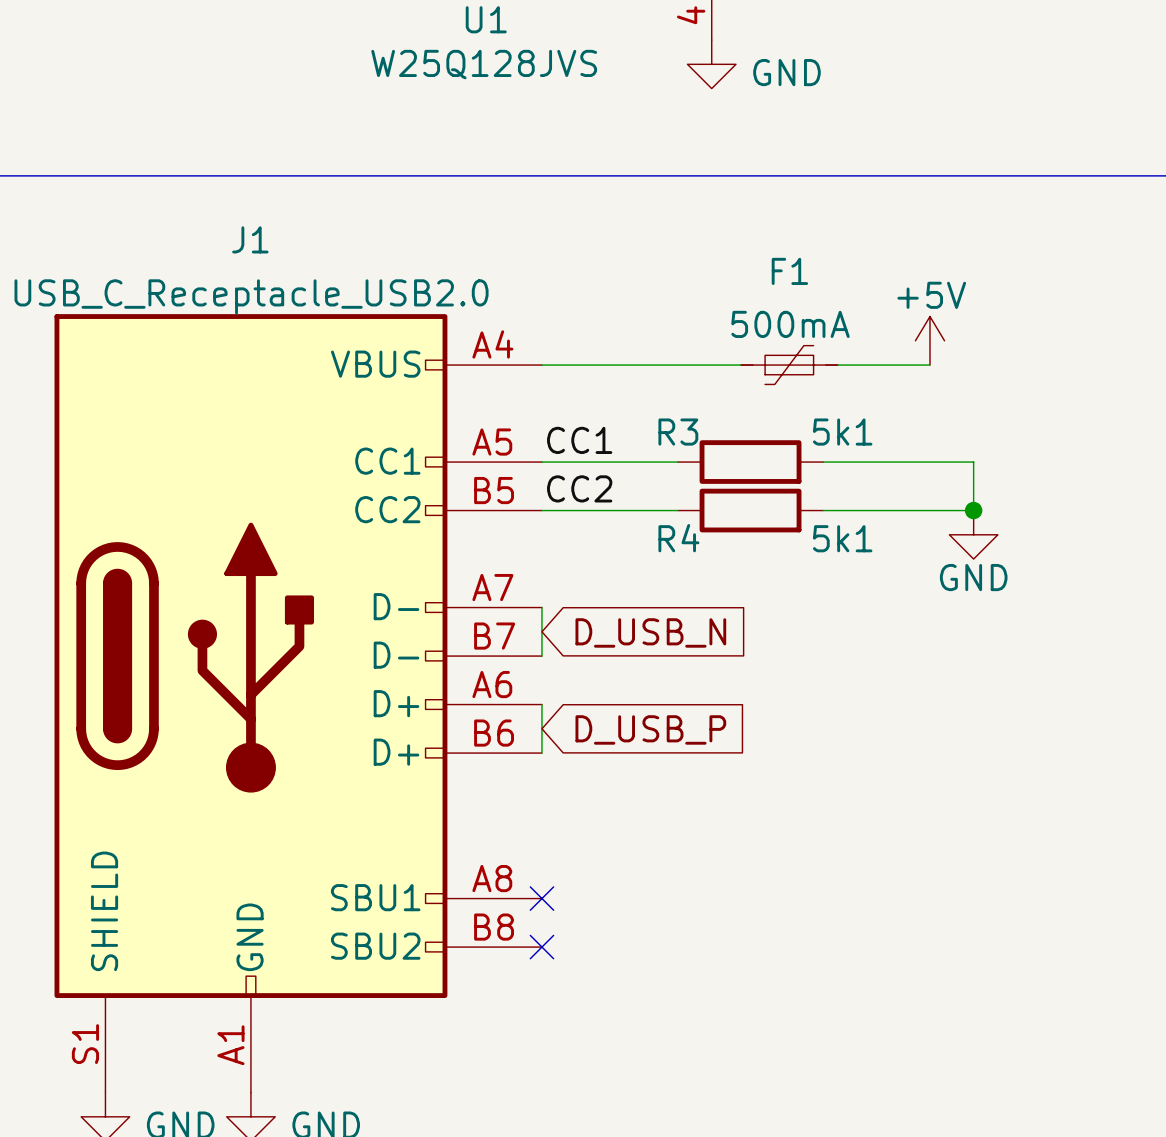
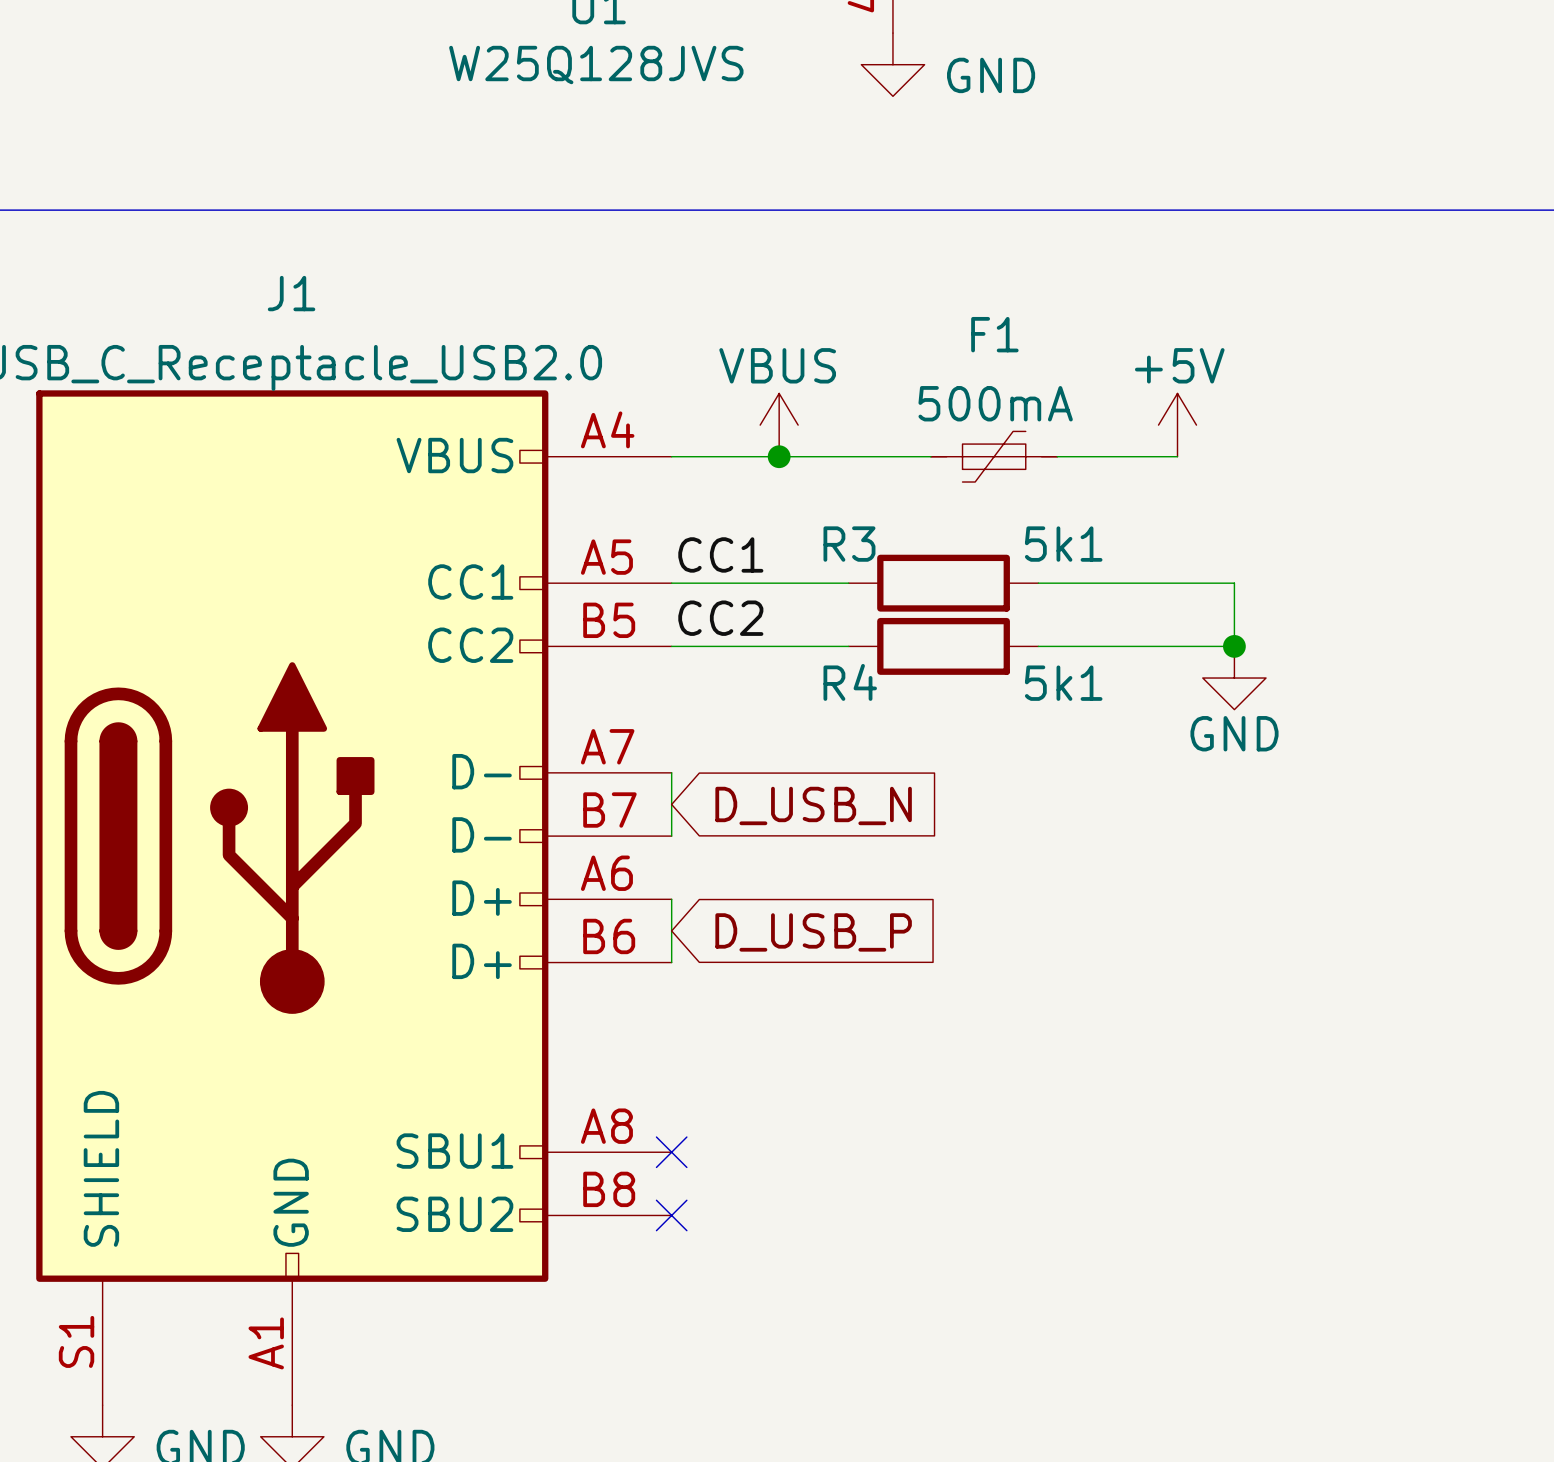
power symbol: none -> VBUS (779, 425)
junction: none -> (779, 456)

